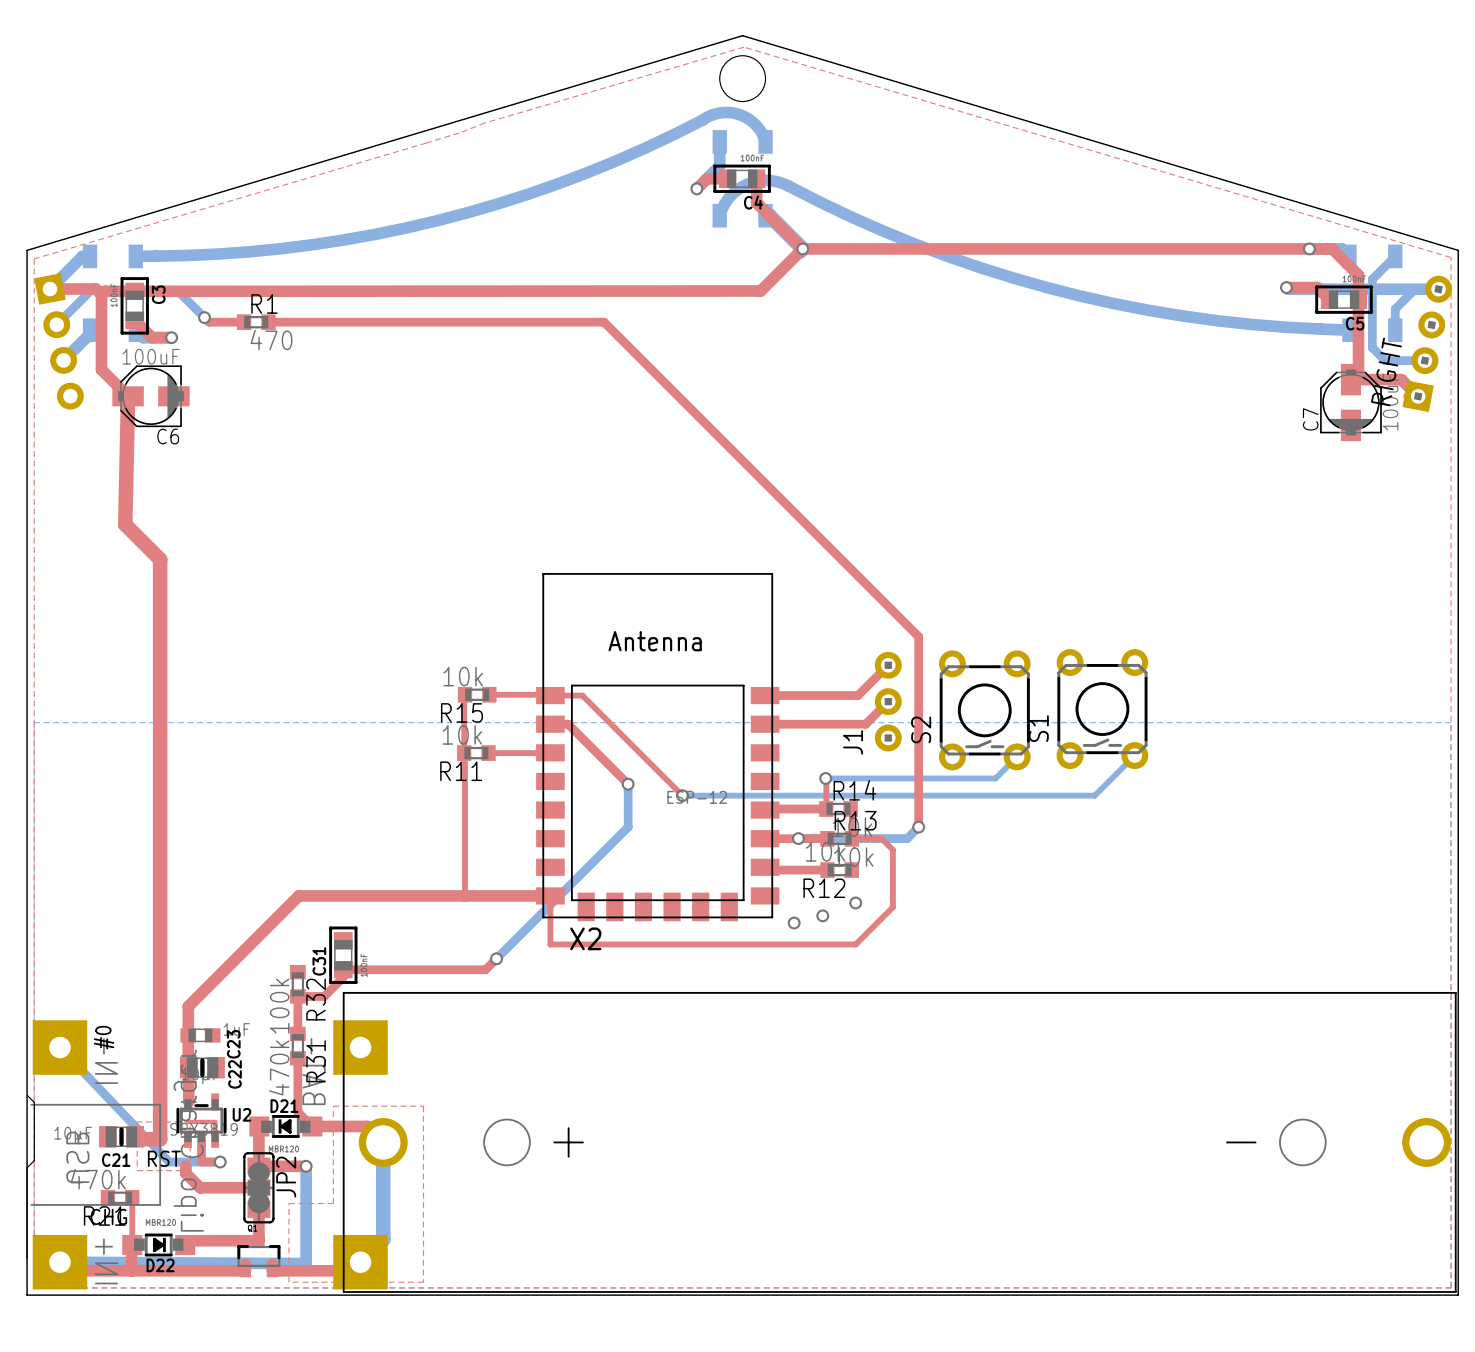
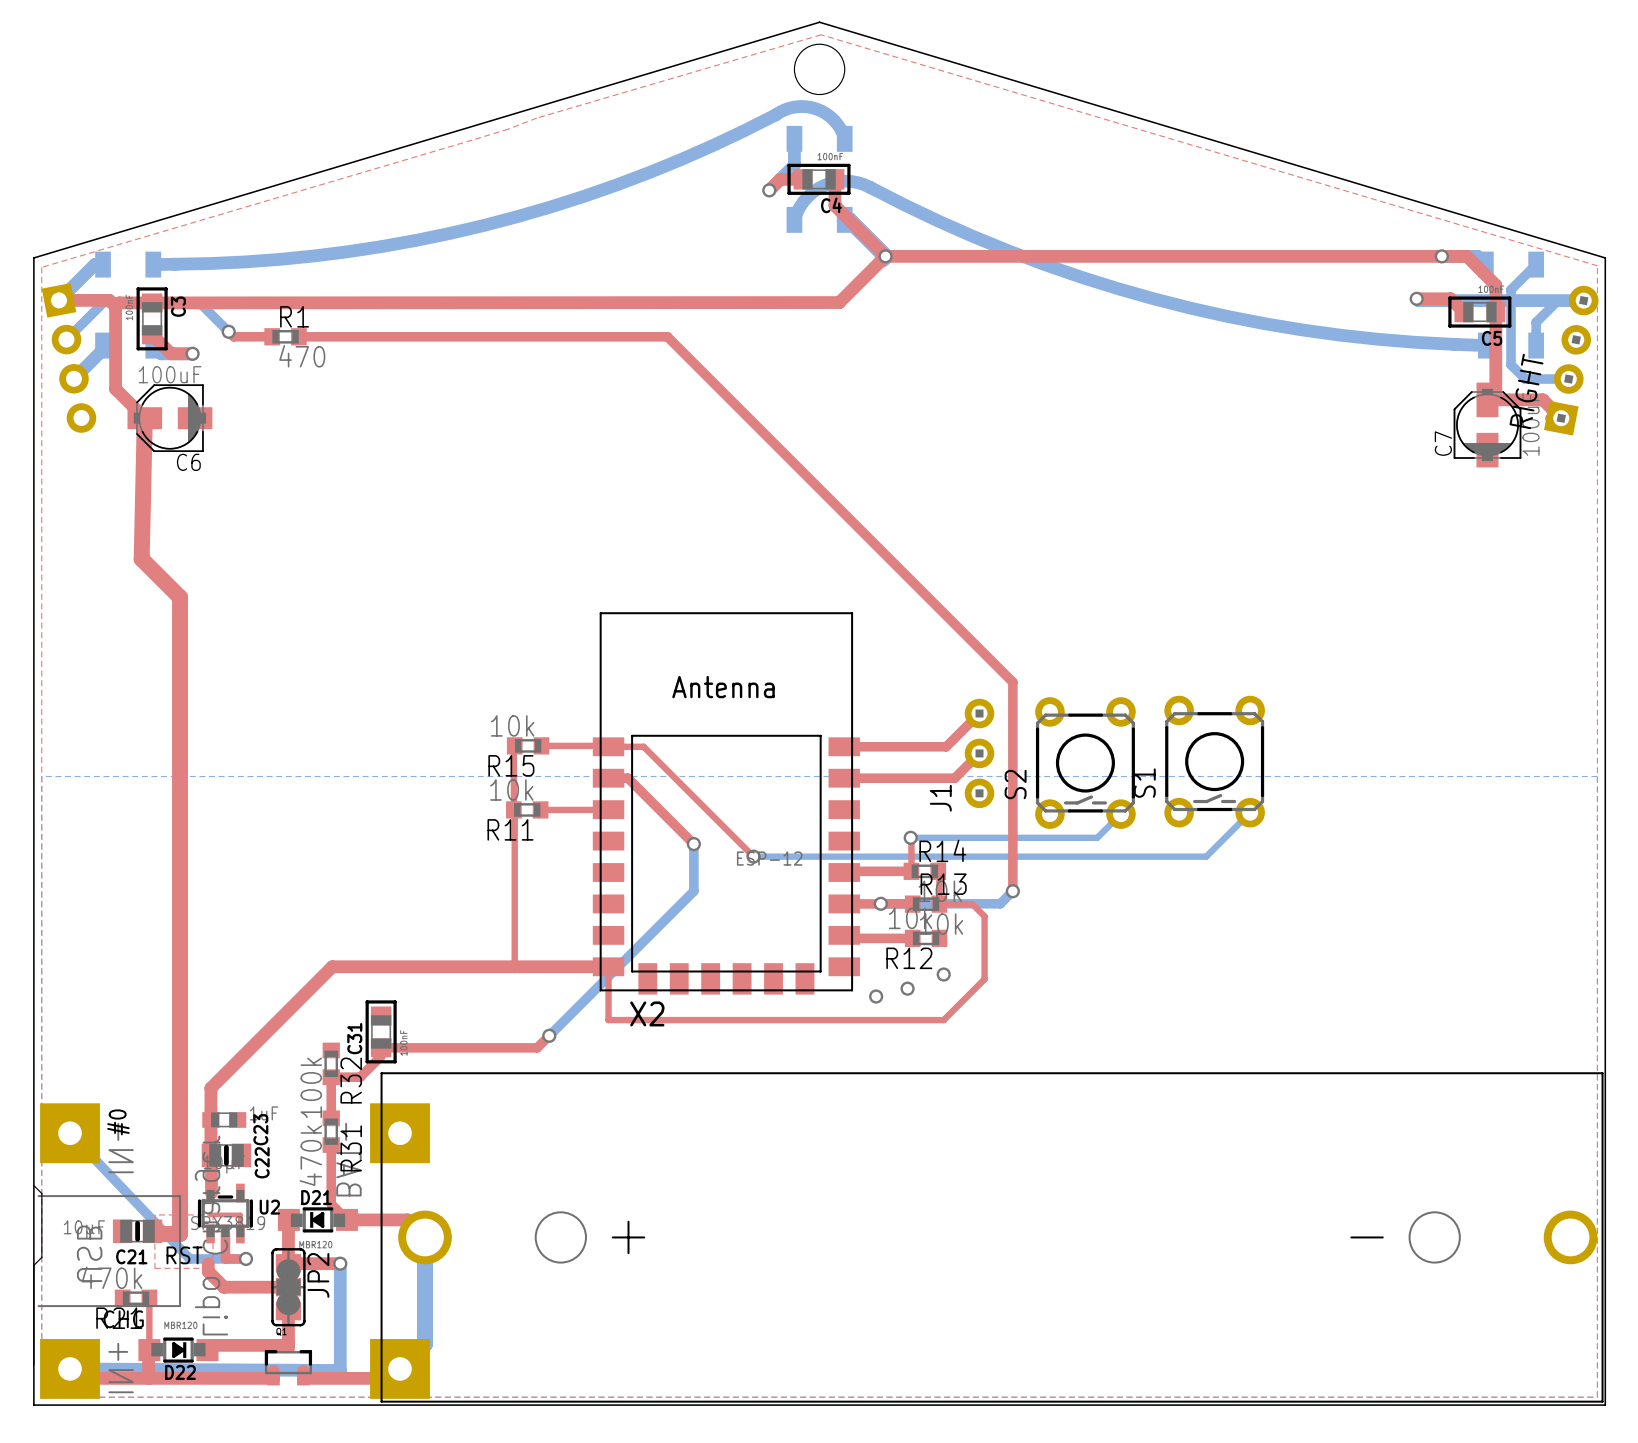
top zone outline: (333, 1106) (423, 1106) (423, 1282) (288, 1282) (288, 1203) (333, 1203) (333, 1106) -> none

